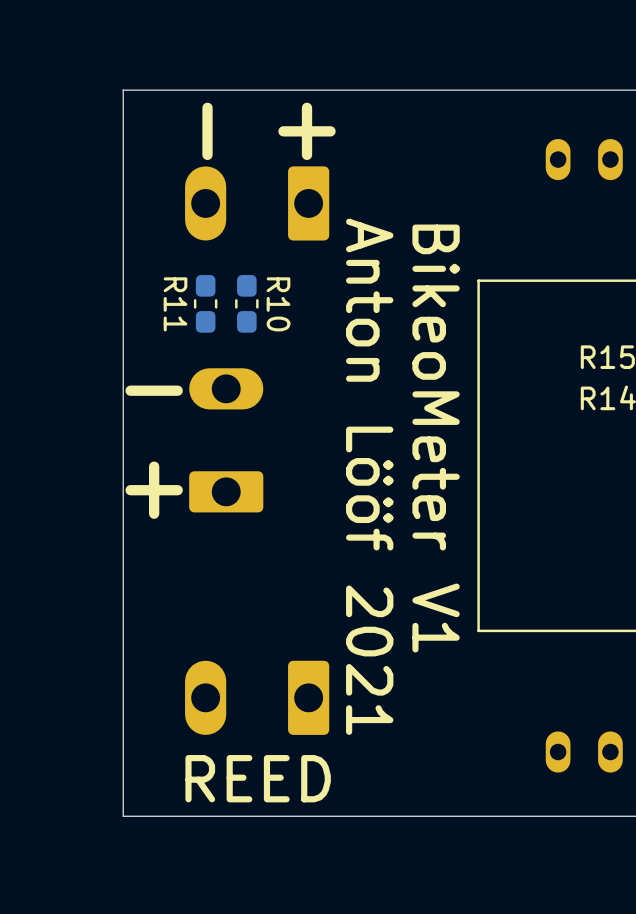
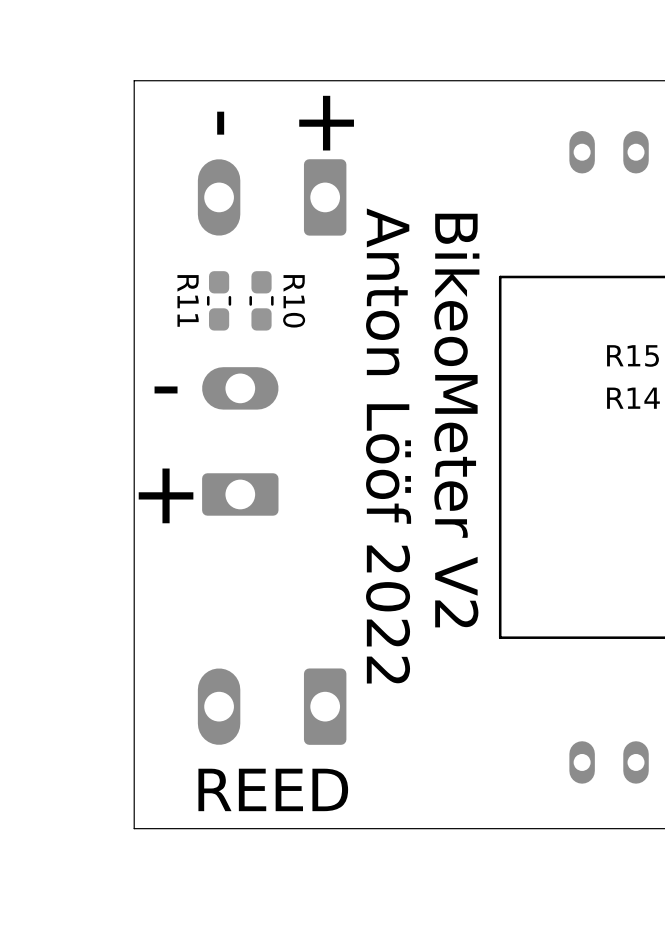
text: BikeoMeter V1 (436, 438) -> BikeoMeter V2 (456, 420)
text: Anton Lööf 2021 (369, 476) -> Anton Lööf 2022 (388, 446)

